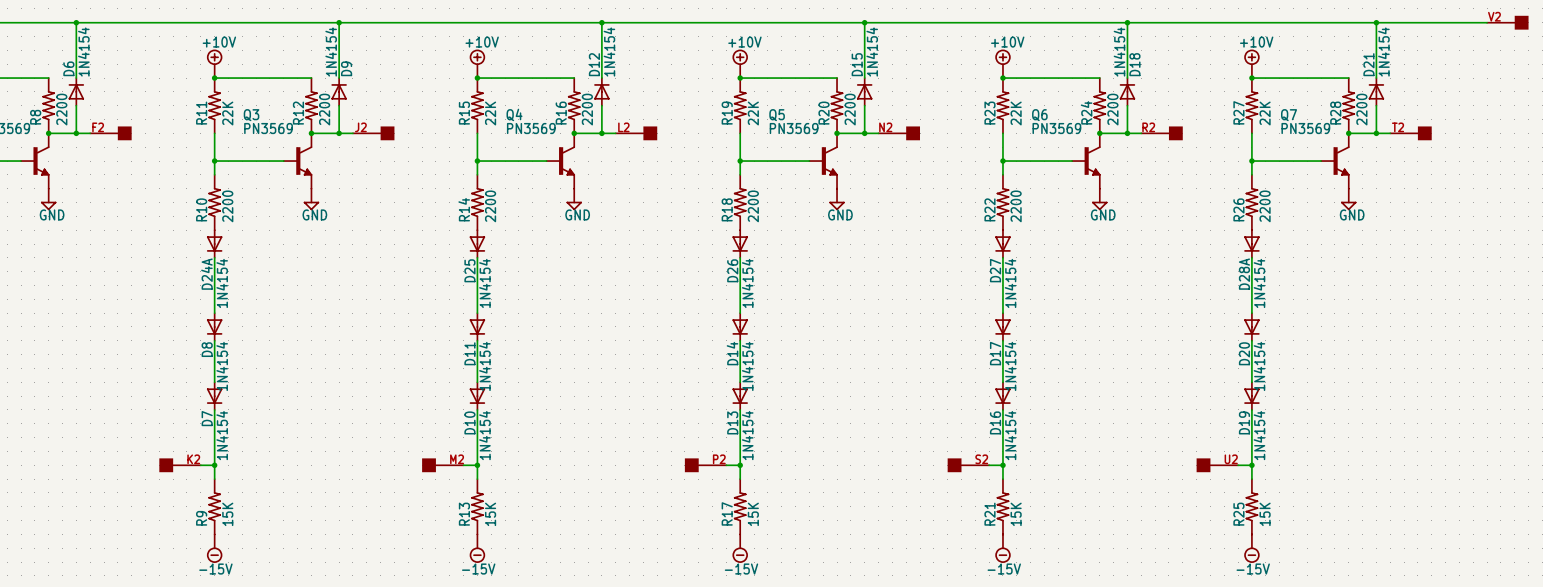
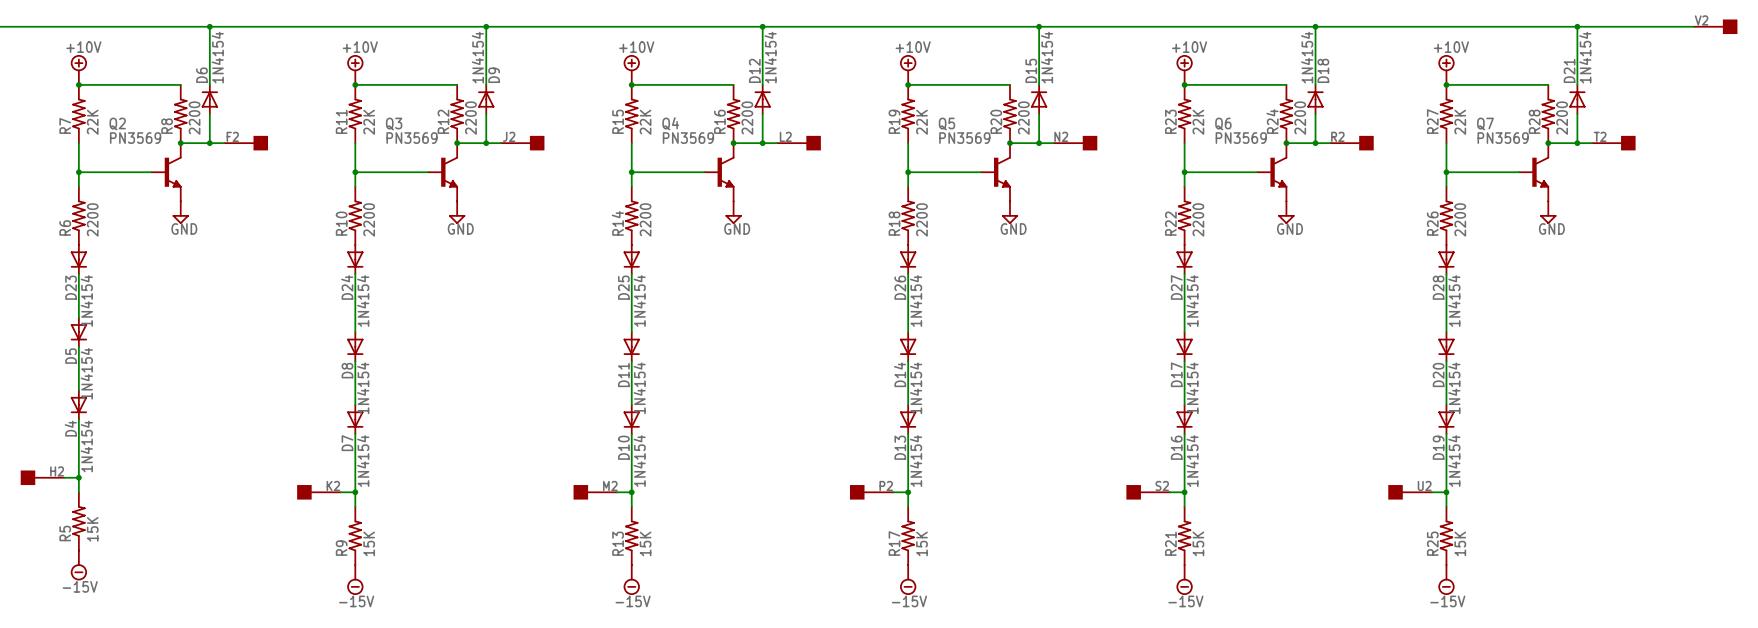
D24A name: D24A (206, 274) -> D24 (347, 287)
D28A name: D28A (1244, 274) -> D28 (1438, 287)

